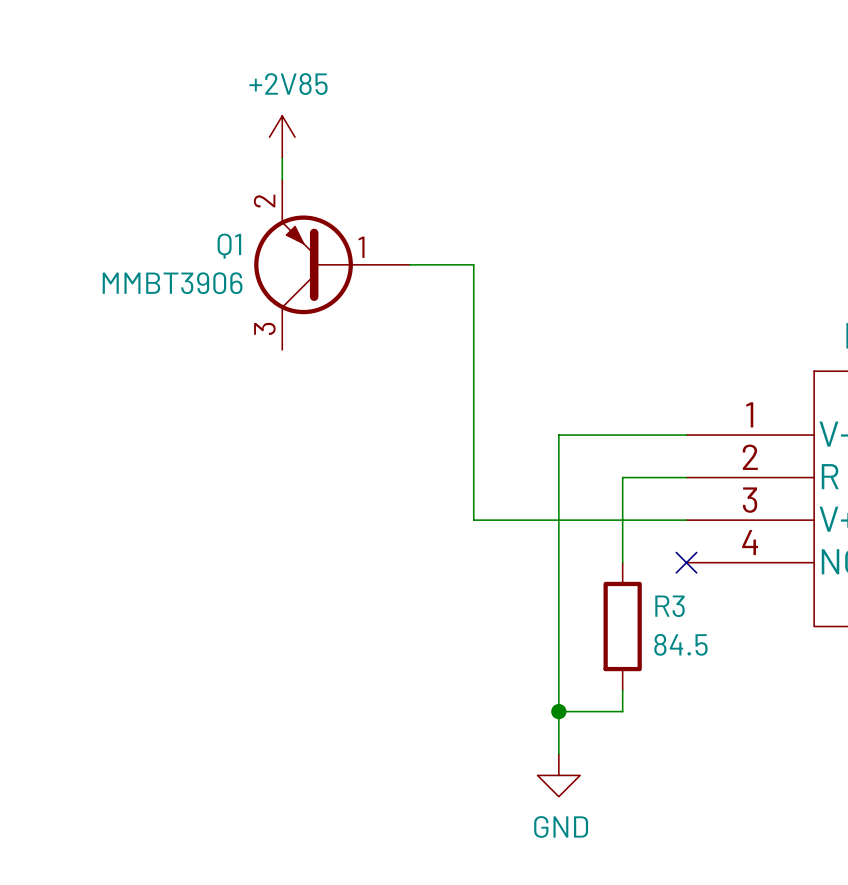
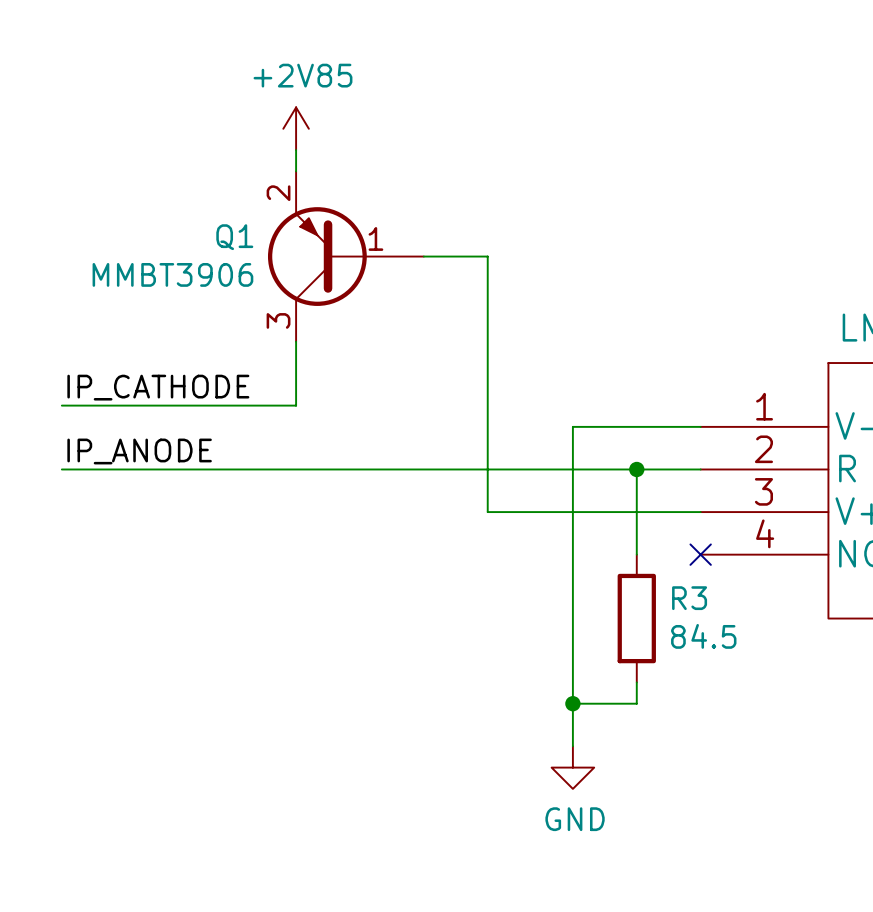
wire: none -> (296, 341) (296, 405) (61, 405)
label: none -> IP_CATHODE (158, 387)
label: none -> IP_ANODE (139, 451)
wire: none -> (61, 469) (636, 469)
junction: none -> (636, 469)

